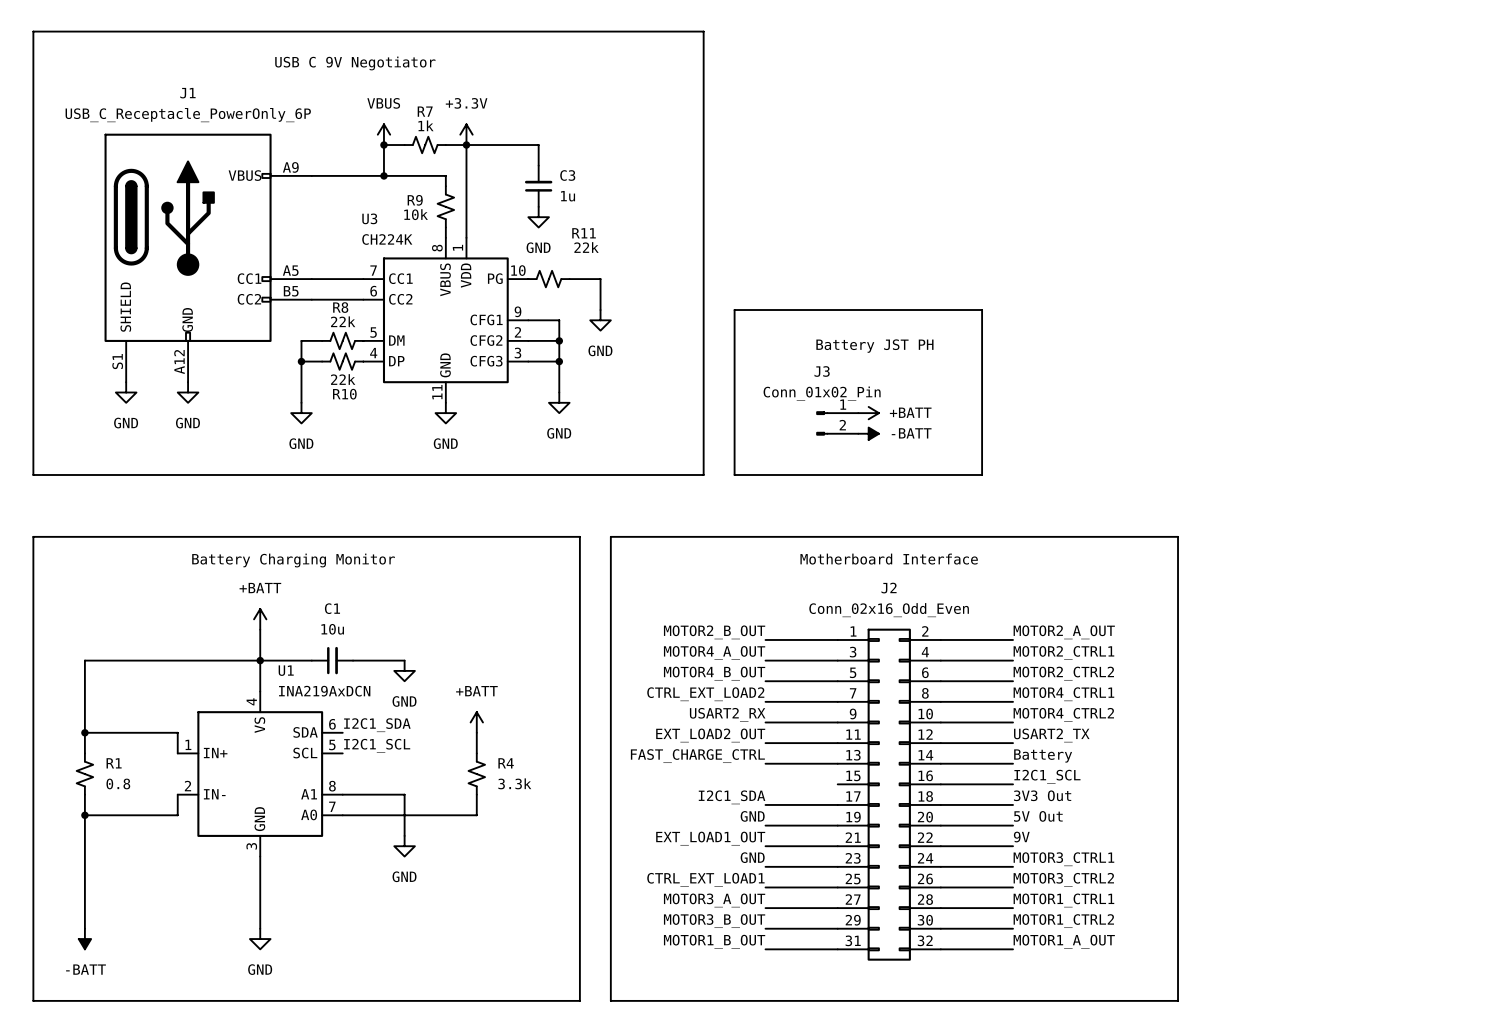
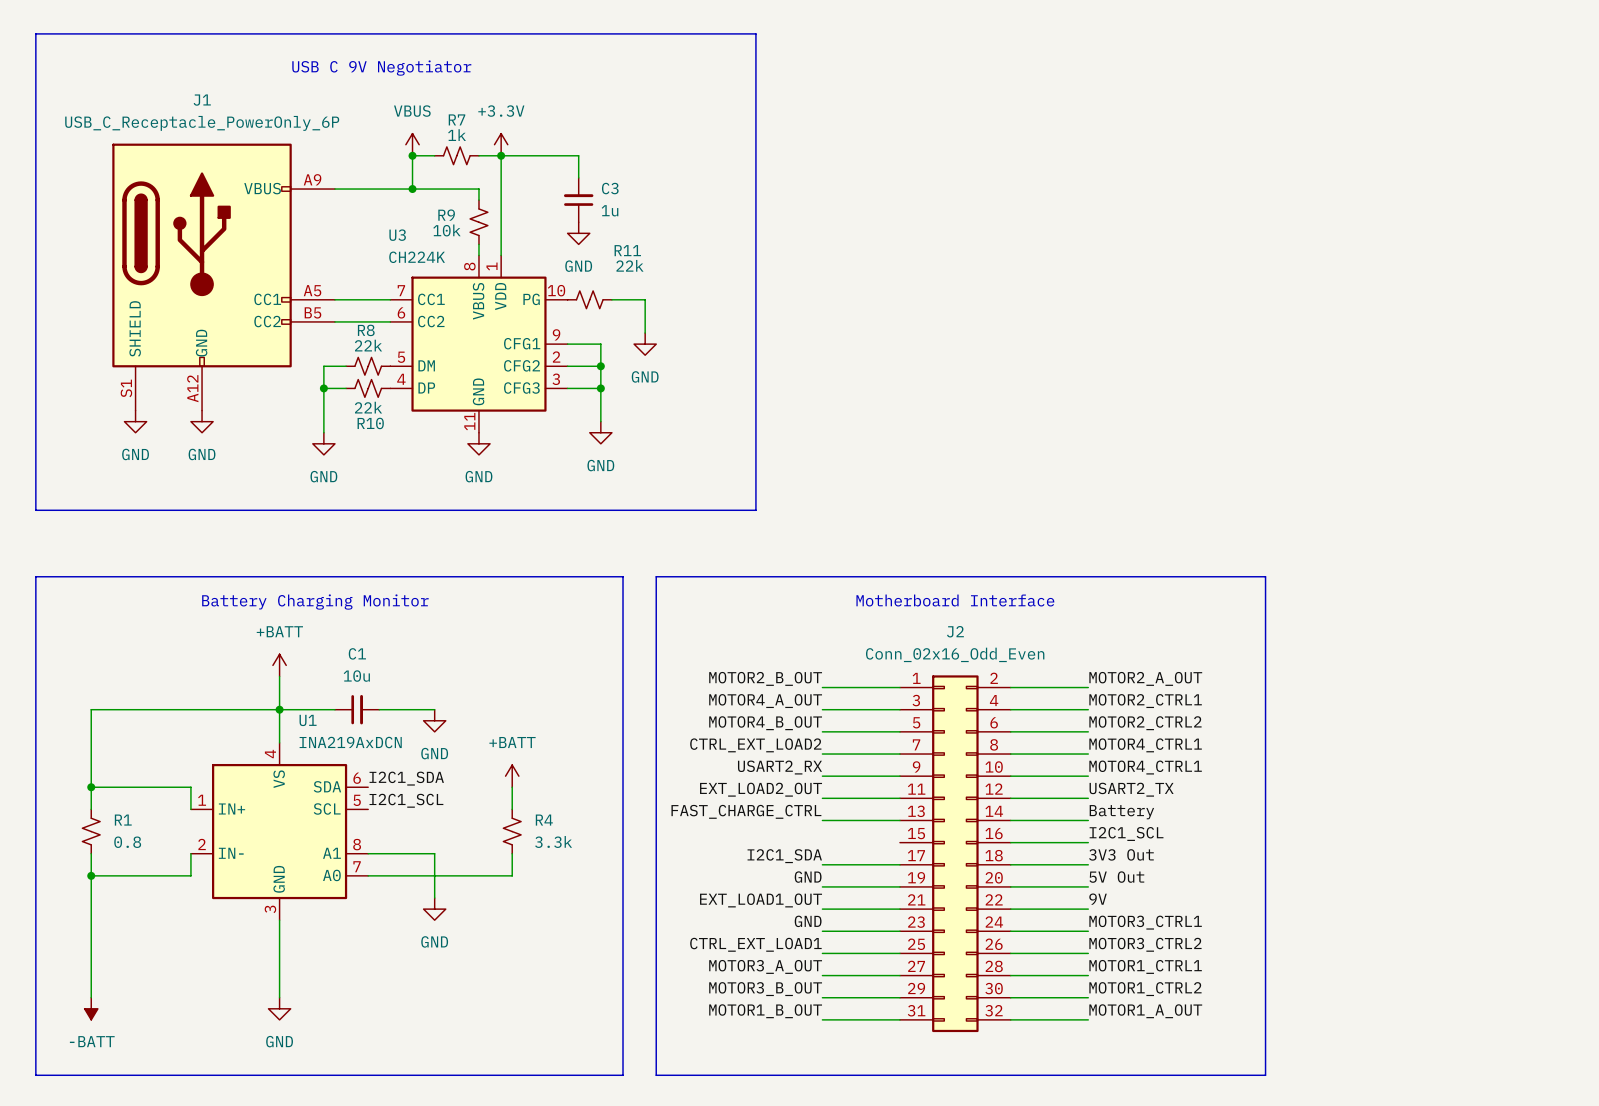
line: (734, 310) (982, 310) (982, 474) (734, 474) (734, 310) -> none
text: Battery JST PH (874, 346) -> none
power symbol: +BATT (868, 413) -> none
J3: Conn_01x02_Pin (837, 423) -> none
power symbol: -BATT (868, 433) -> none
label: MOTOR4_CTRL2 (1063, 714) -> MOTOR4_CTRL1 (1145, 767)

